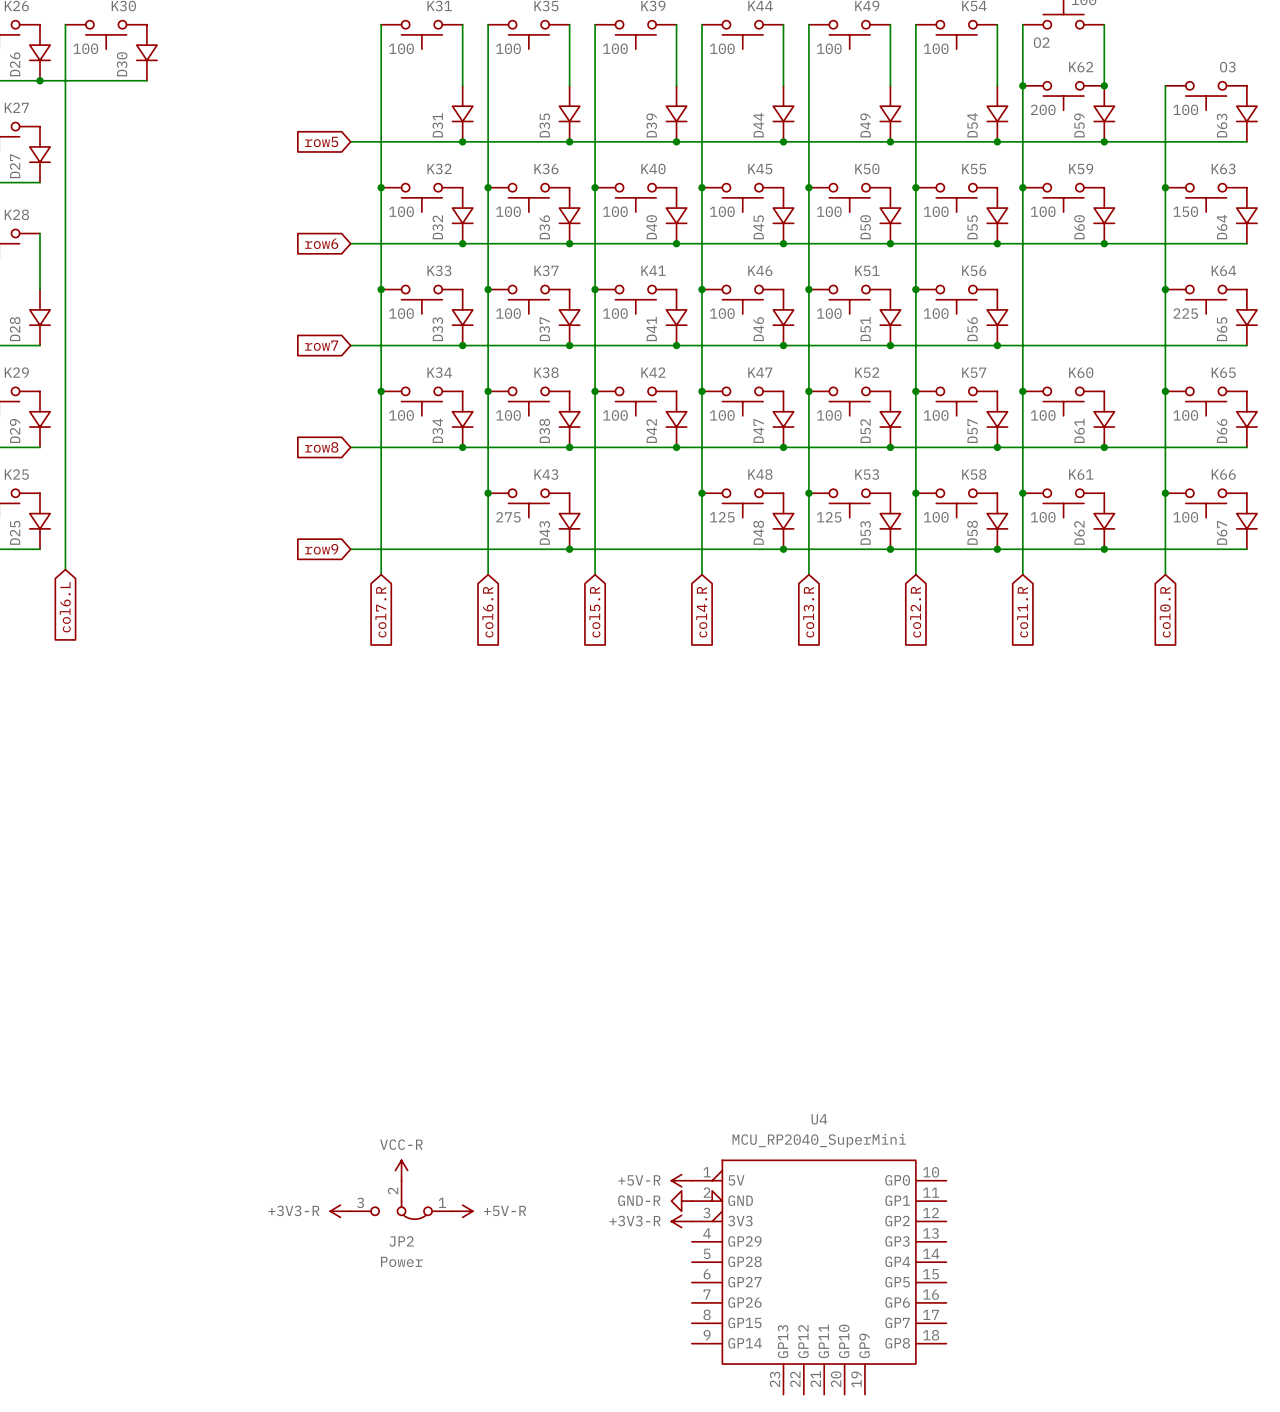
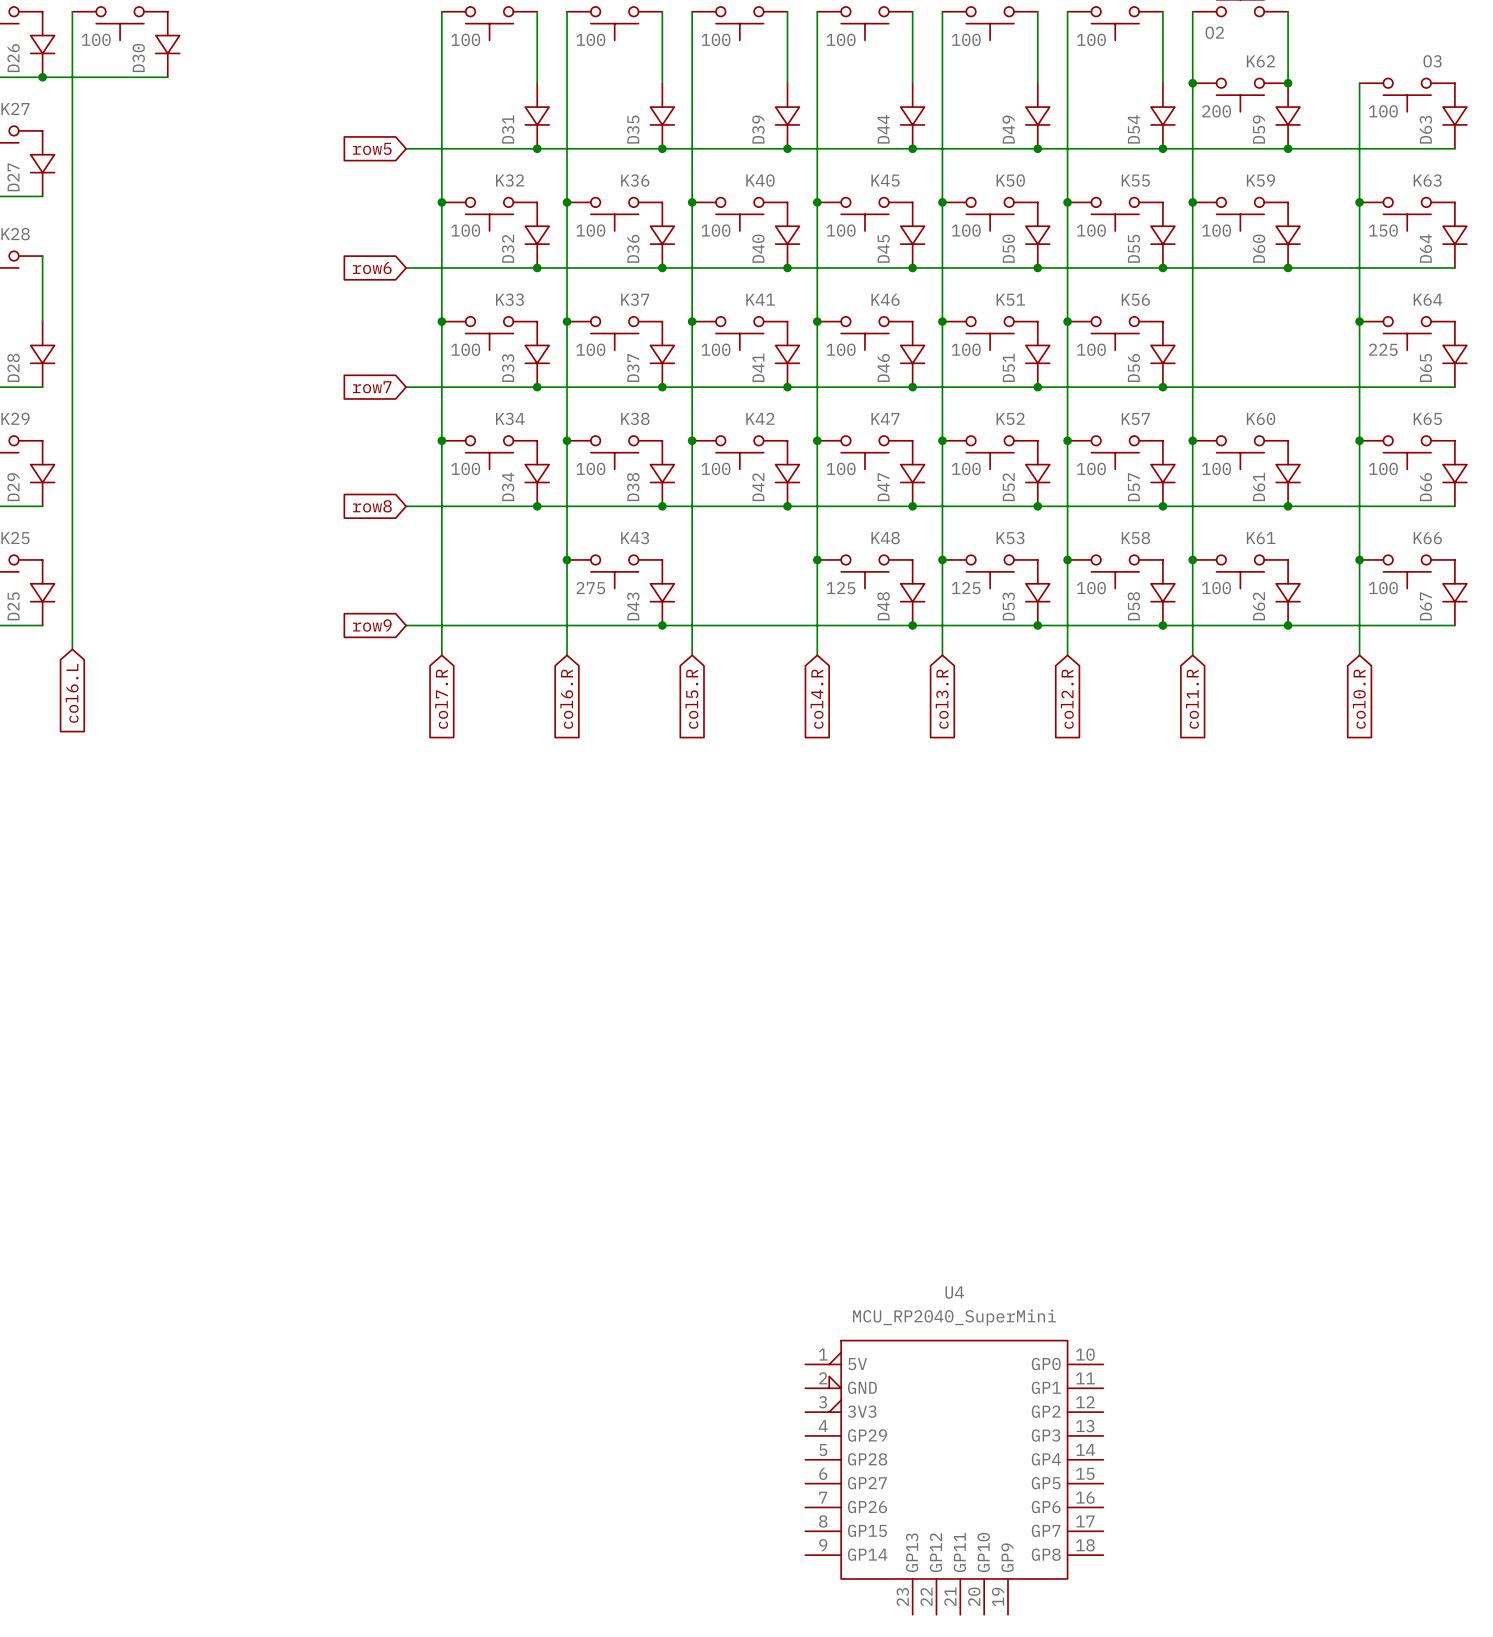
power symbol: VCC-R (401, 1170) -> none
power symbol: +5V-R (681, 1180) -> none
JP2: Power (401, 1199) -> none
power symbol: GND-R (681, 1201) -> none
power symbol: +3V3-R (340, 1211) -> none
power symbol: +5V-R (462, 1211) -> none
power symbol: +3V3-R (681, 1221) -> none

